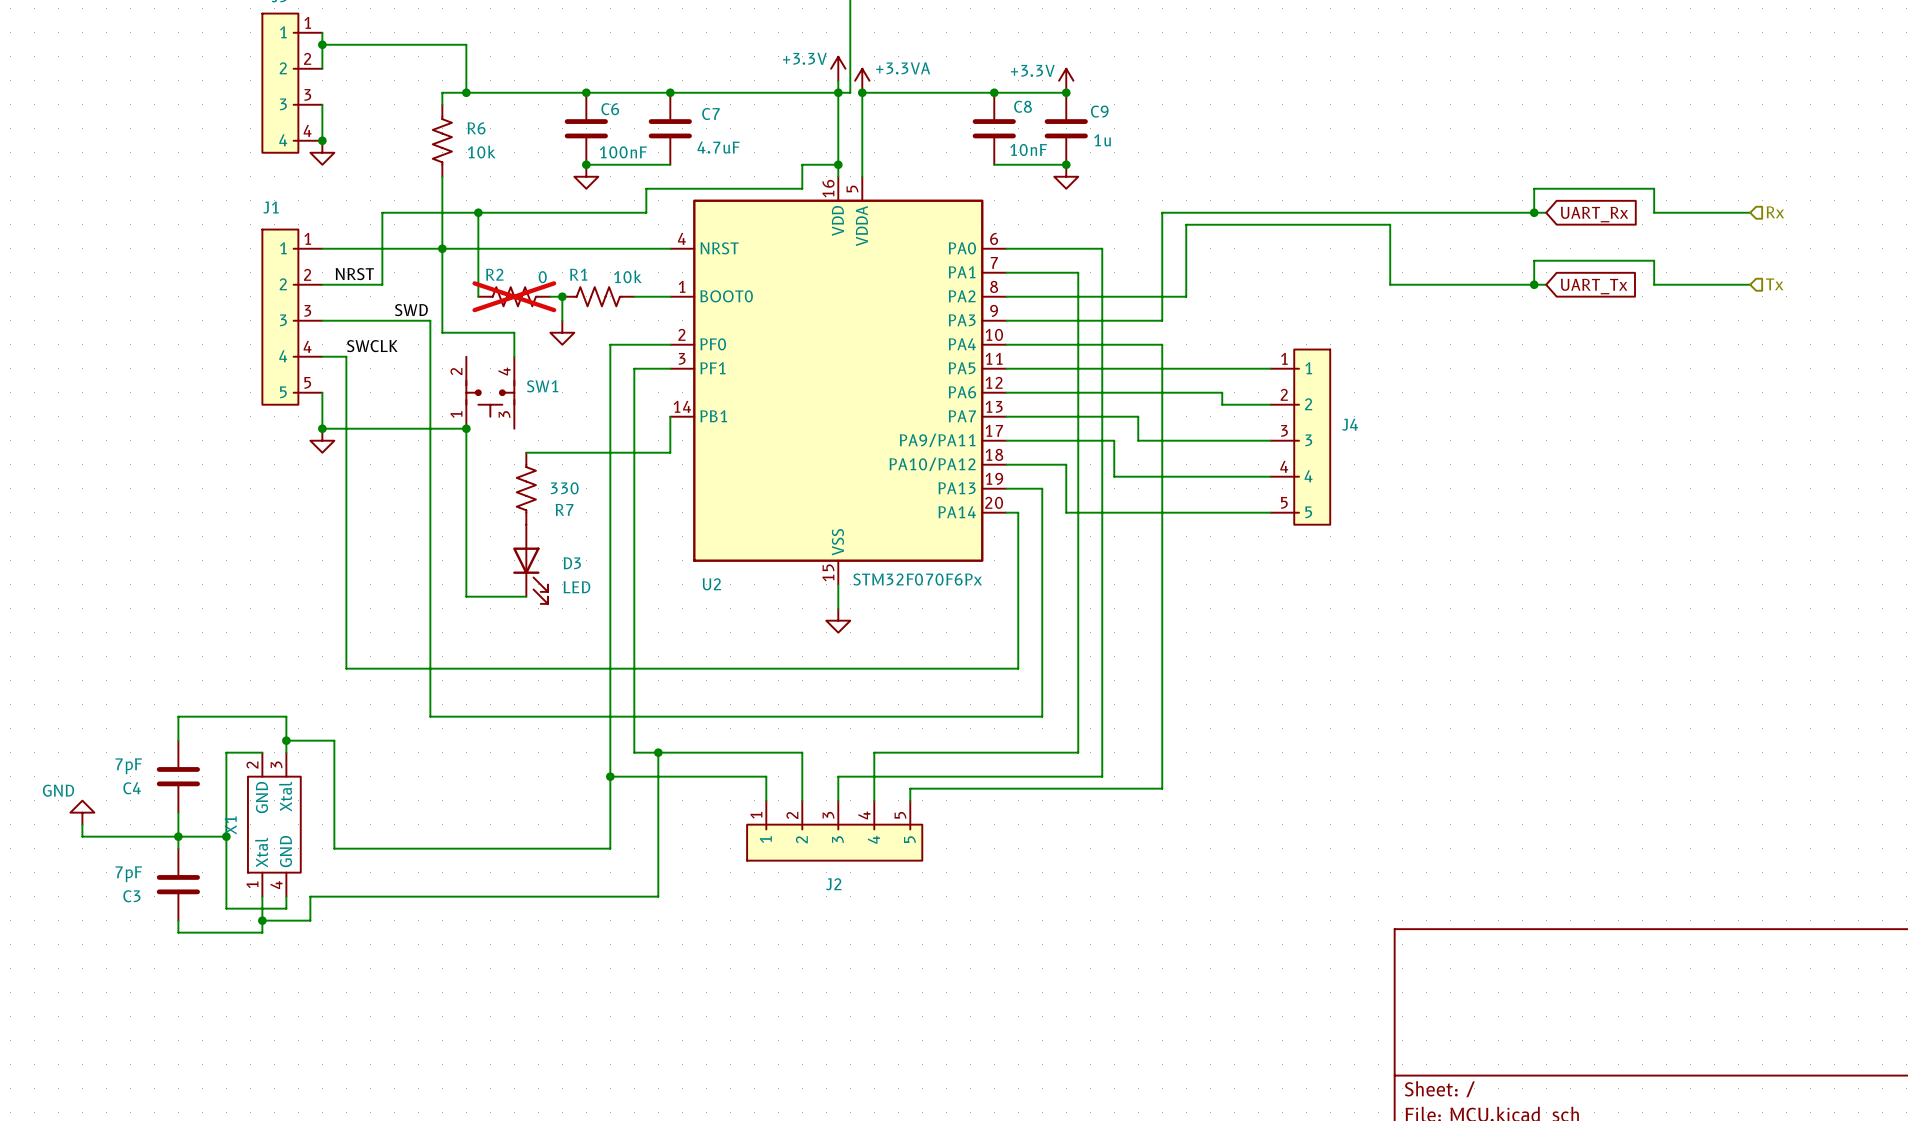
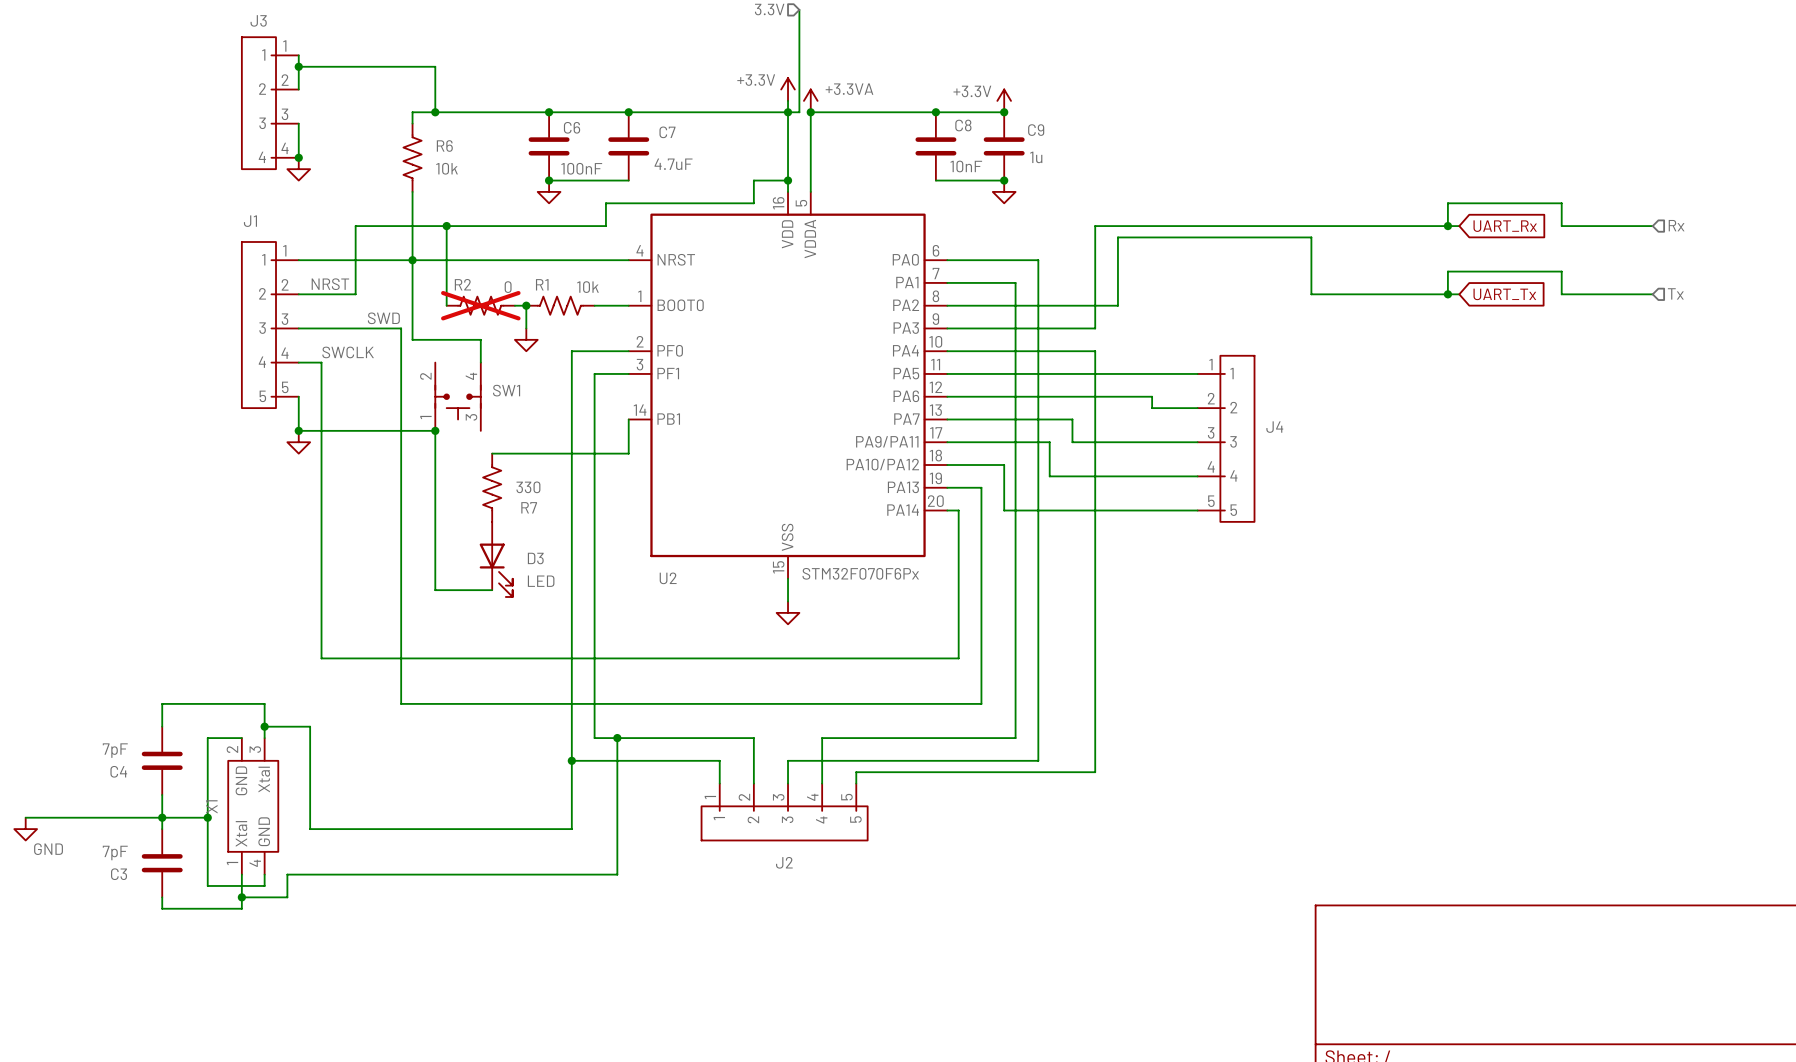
power symbol rotation: 0° (82, 812) -> 180° (25, 829)
power symbol position: GND (82, 812) -> GND (25, 829)
wire: (82, 824) (82, 836) -> (25, 817) (71, 817)

